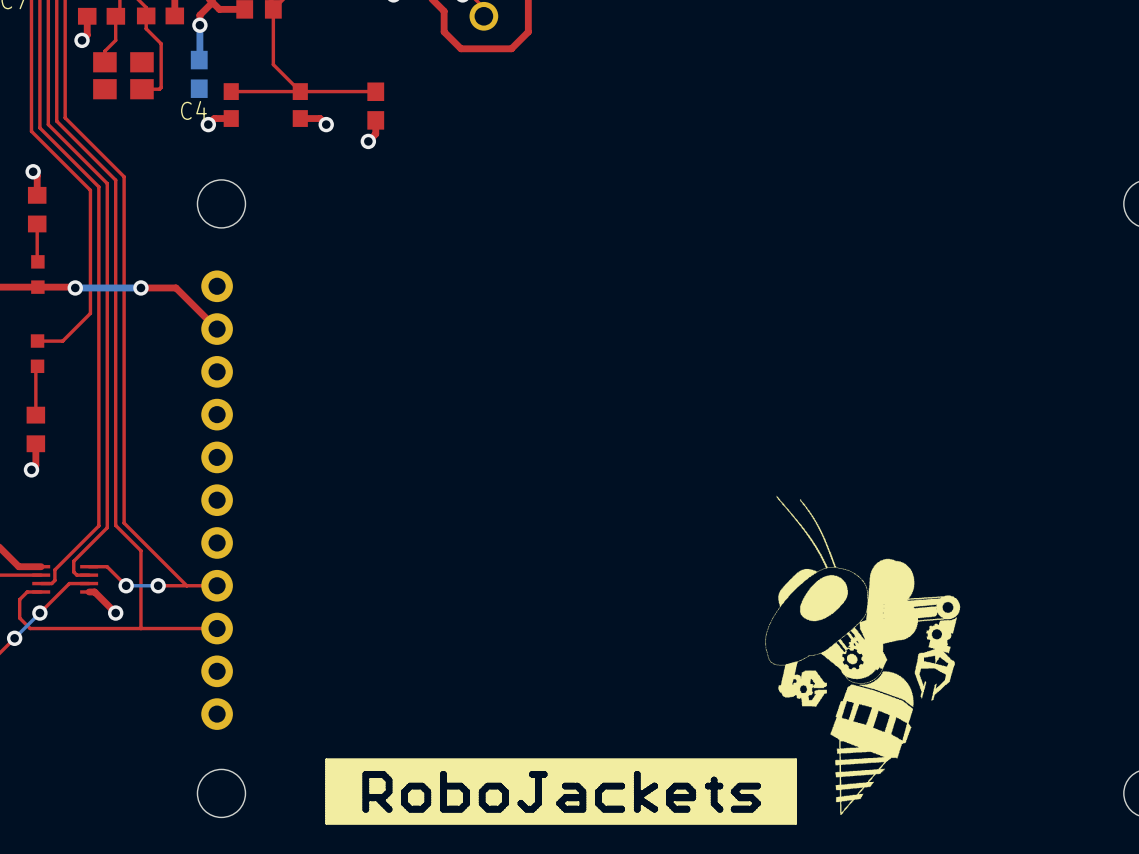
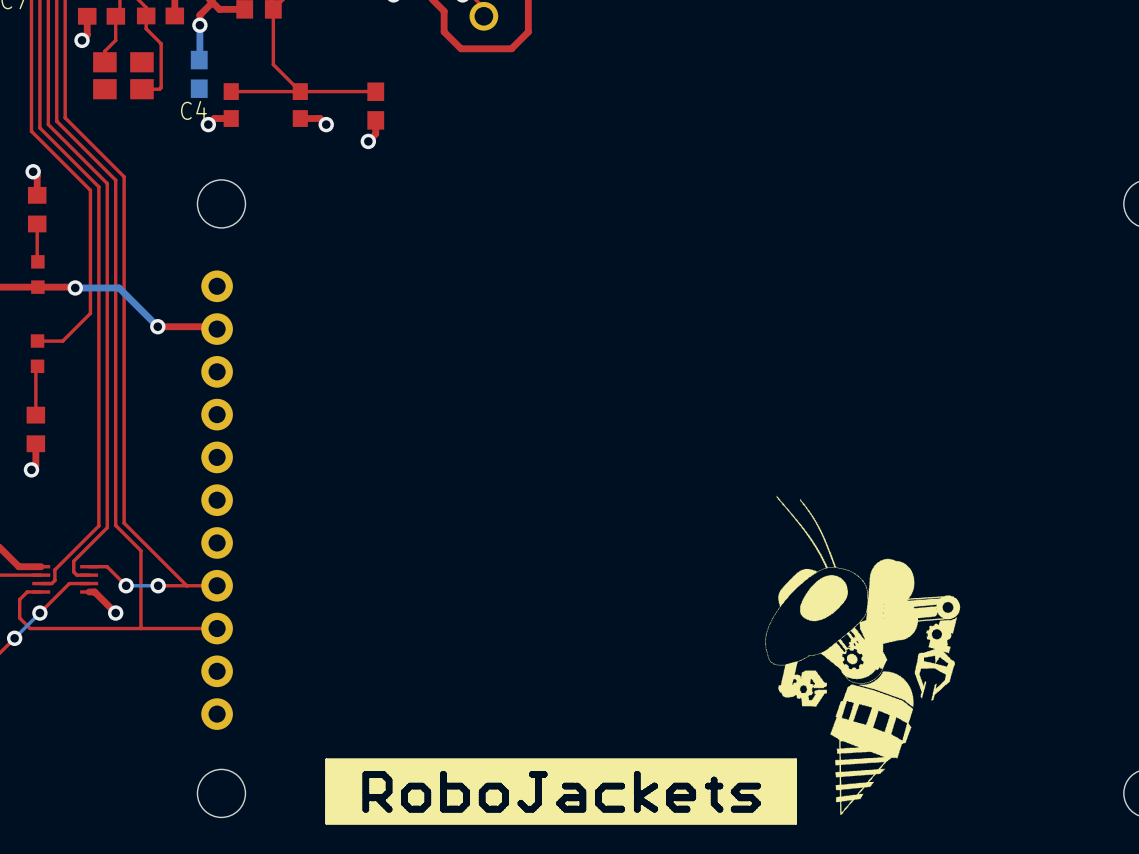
top track: (140, 287) (175, 287) (214, 326) -> (157, 326) (214, 326)
bottom track: (140, 287) (119, 287) -> (157, 326) (119, 287)
via position: (140, 287) -> (157, 326)

